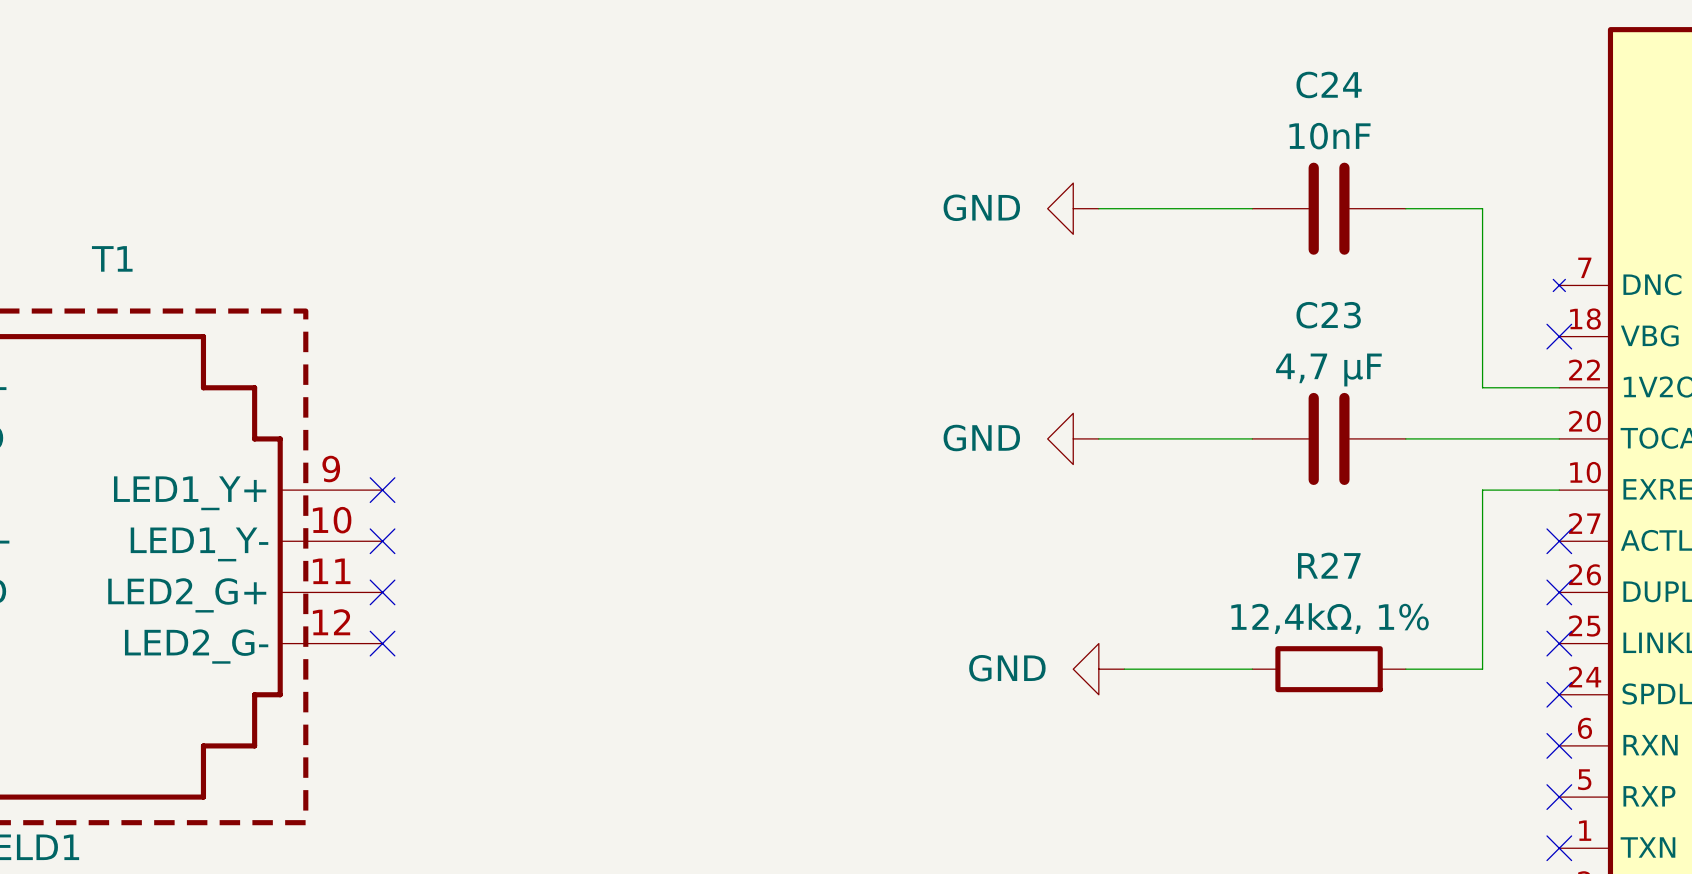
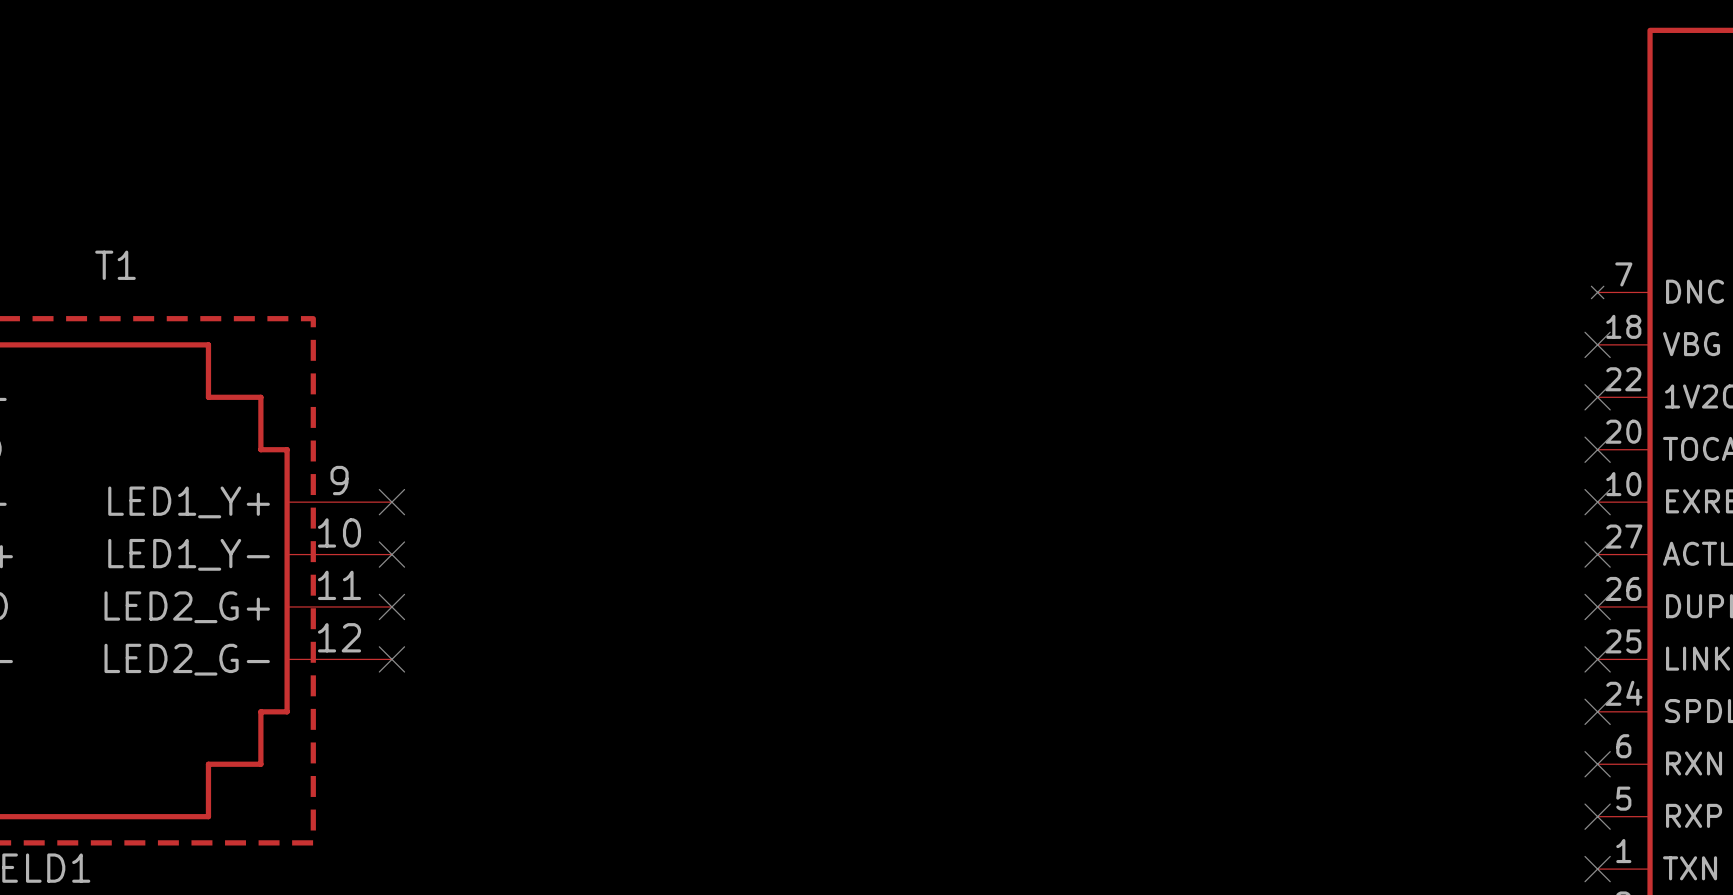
power symbol: GND (1073, 208) -> none
wire: (1098, 208) (1252, 208) -> none
C24: 10nF (1329, 208) -> none
wire: (1405, 208) (1482, 208) (1482, 387) (1559, 387) -> none
no-connect mark: none -> (1597, 397)
power symbol: GND (1073, 438) -> none
wire: (1098, 438) (1252, 438) -> none
C23: 4,7 µF (1329, 438) -> none
wire: (1405, 438) (1559, 438) -> none
no-connect mark: none -> (1597, 449)
wire: (1559, 490) (1482, 490) (1482, 669) (1405, 669) -> none
no-connect mark: none -> (1597, 502)
power symbol: GND (1098, 669) -> none
wire: (1124, 669) (1252, 669) -> none
R27: 12,4kΩ, 1% (1329, 669) -> none

